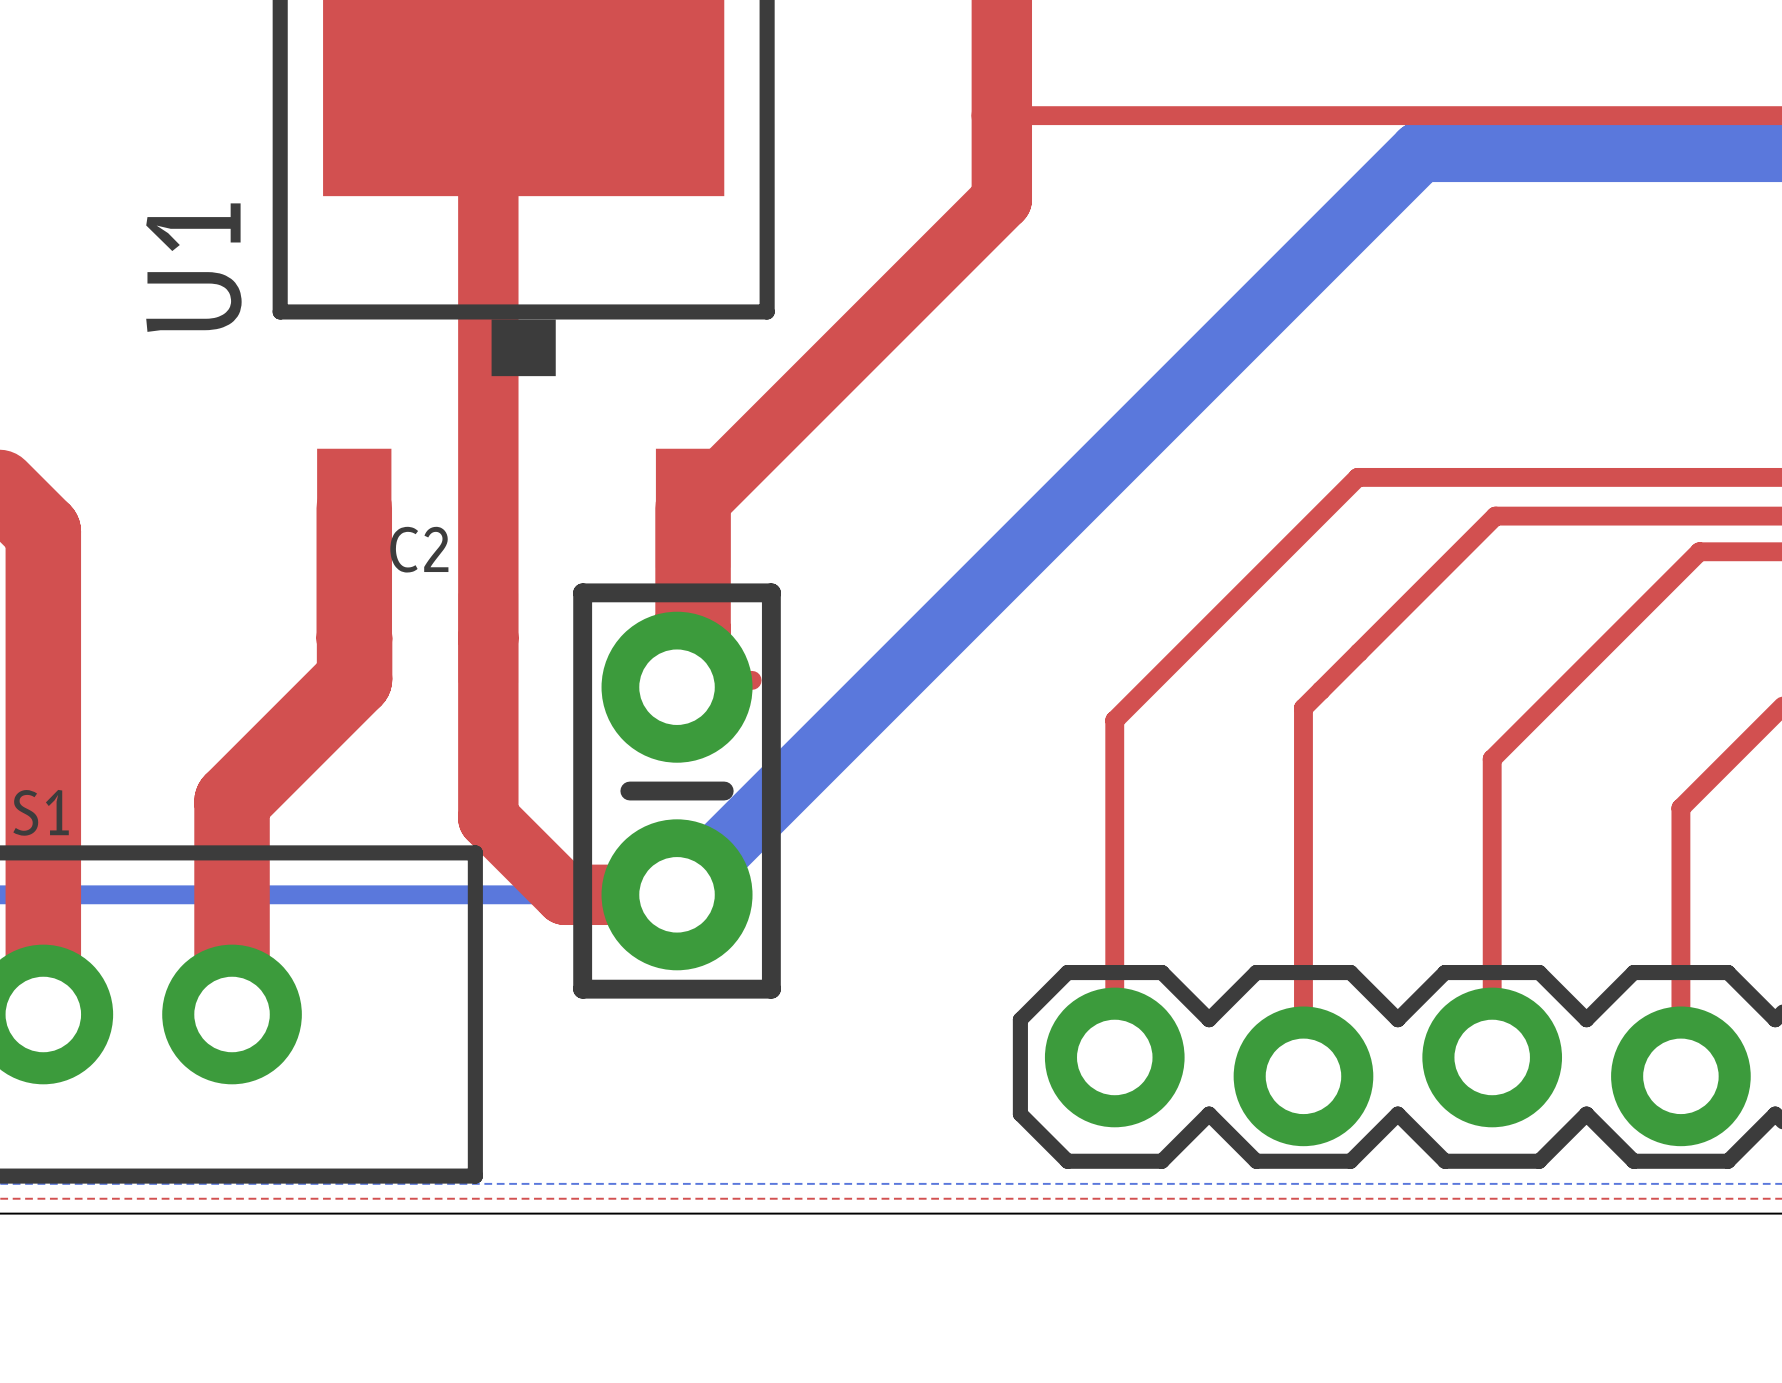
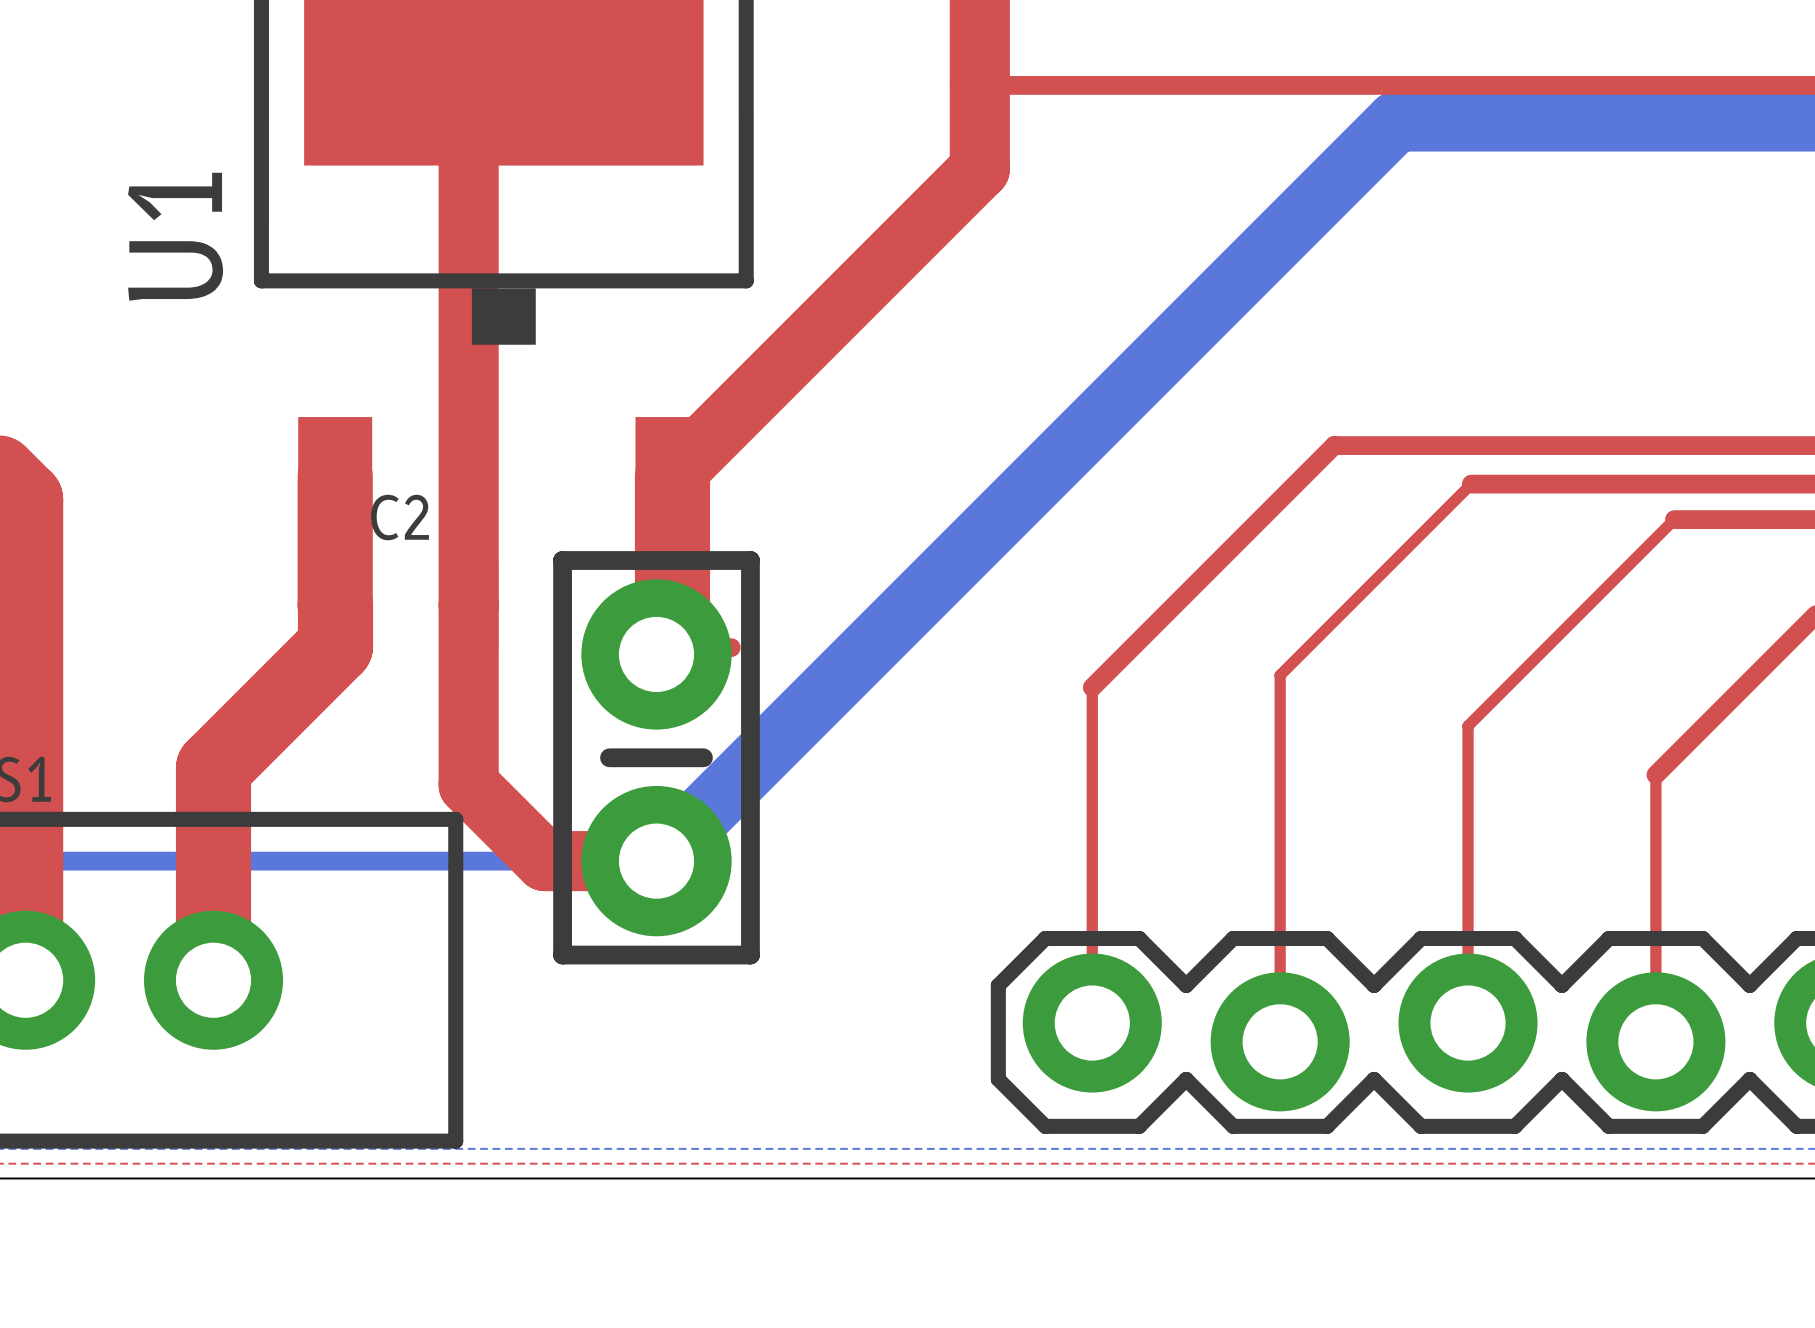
top track width: thick (1495, 516) (1303, 708) (1303, 1076) -> thin (1471, 484) (1280, 675) (1280, 1041)
top track width: thick (1699, 551) (1492, 759) (1492, 1057) -> thin (1674, 519) (1468, 726) (1468, 1023)
top track width: thick (1114, 720) (1114, 1057) -> thin (1092, 687) (1092, 1023)
top track width: thick (1680, 808) (1680, 1076) -> thin (1655, 774) (1655, 1041)

